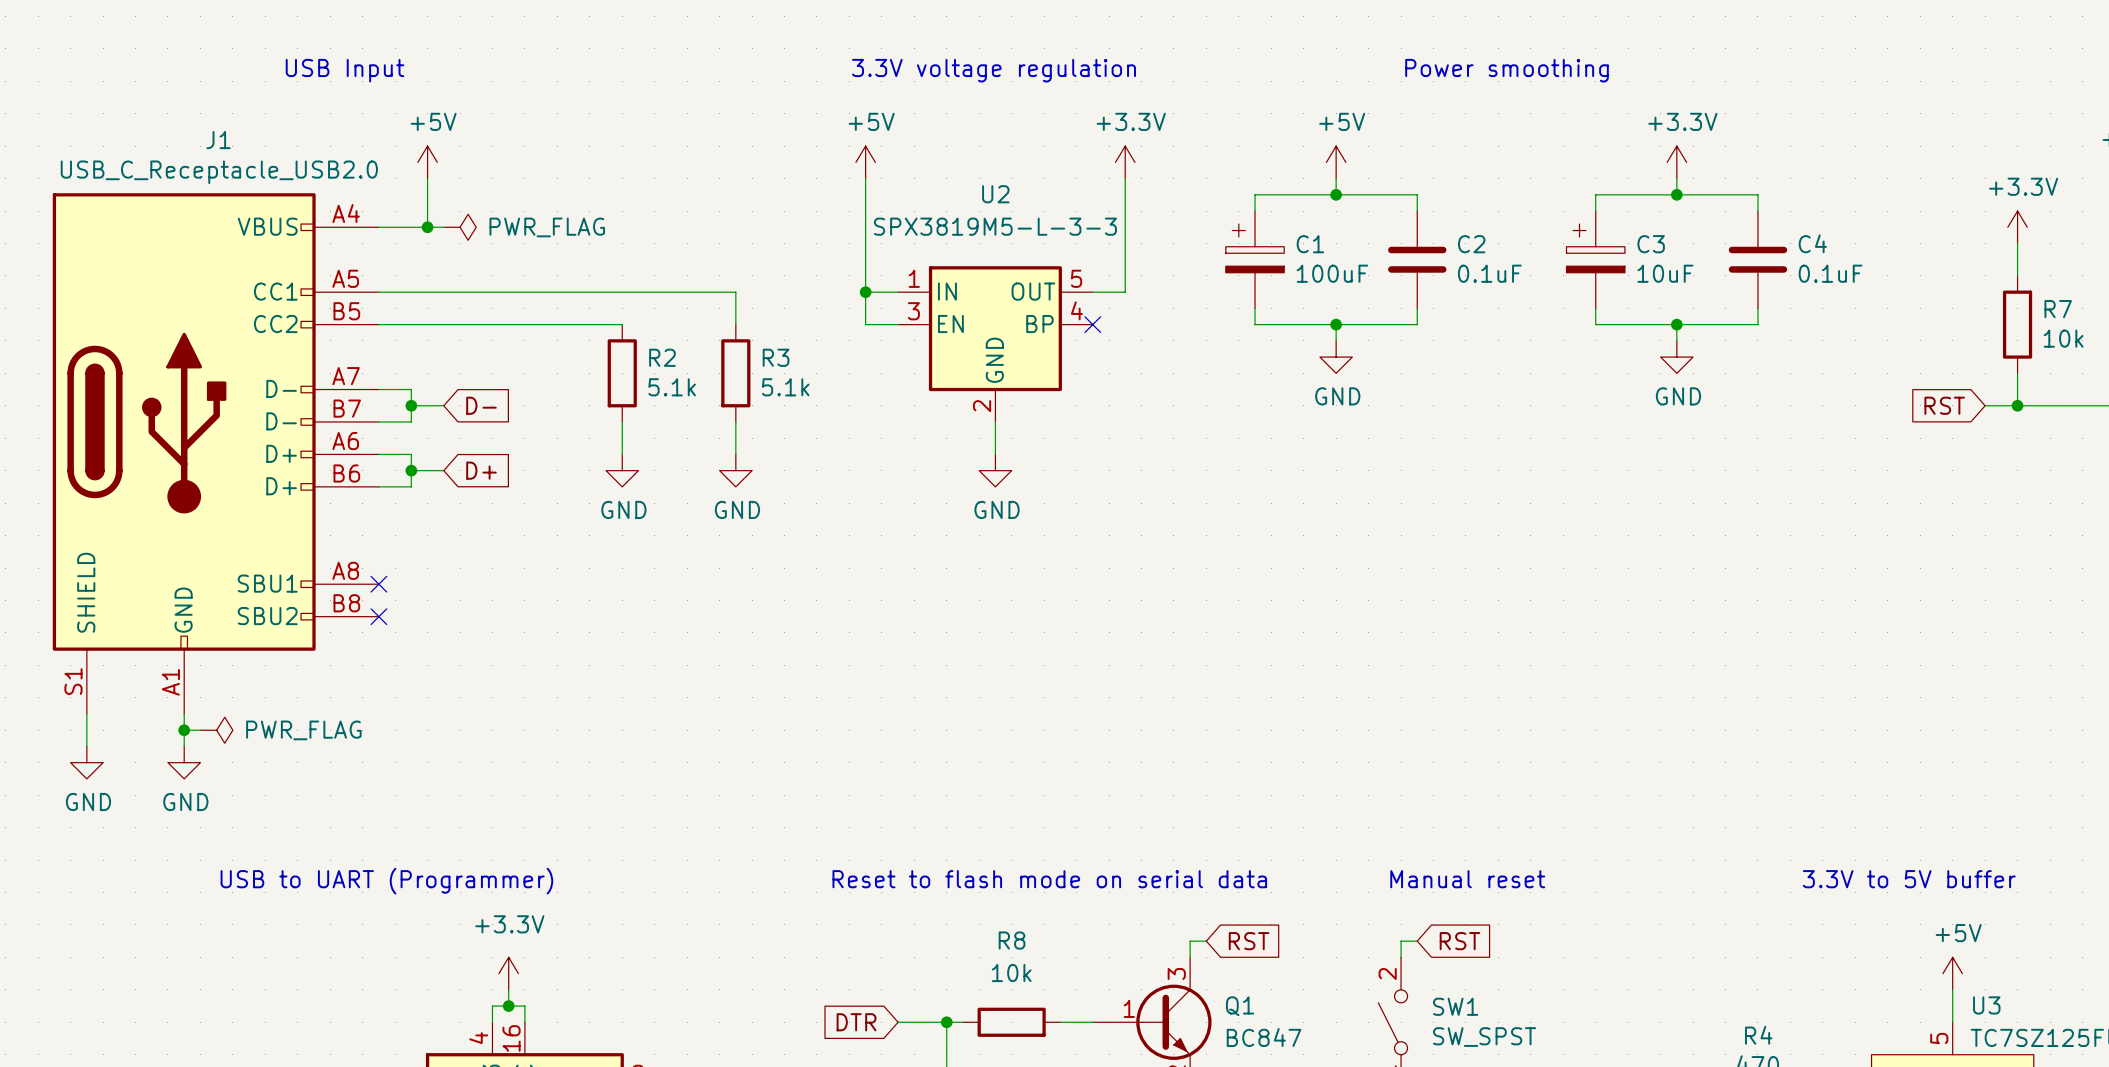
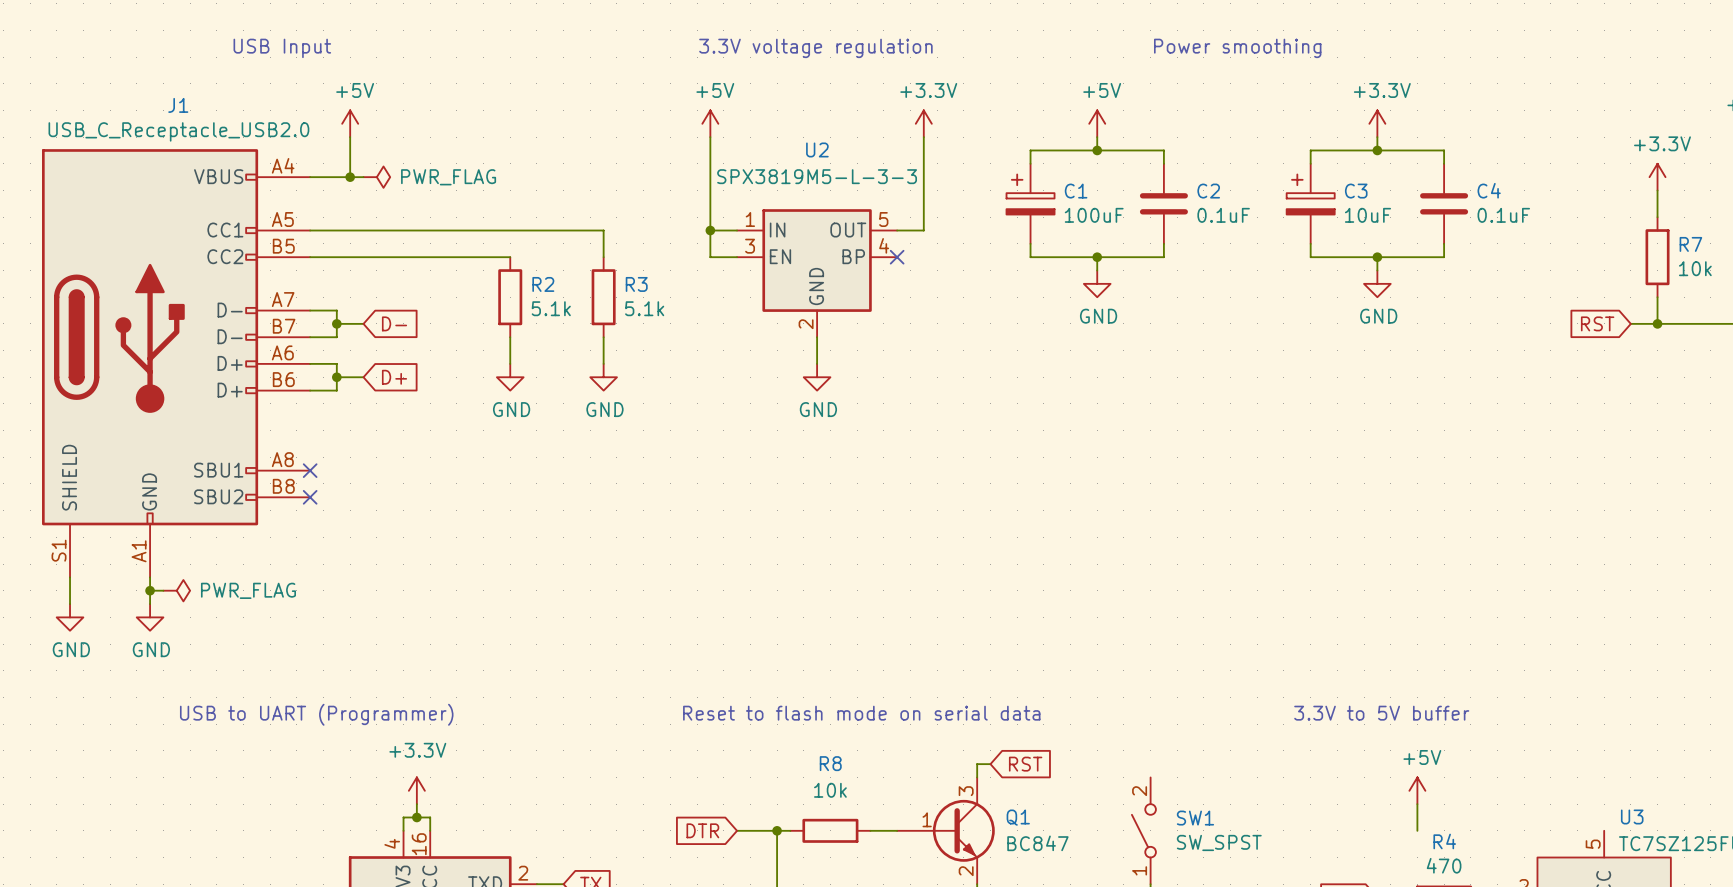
text: Manual reset (1467, 879) -> none
text position: 3.3V to 5V buffer (1909, 879) -> 3.3V to 5V buffer (1381, 713)
wire: (1417, 941) (1401, 941) (1401, 957) -> none
global label: RST (1459, 941) -> none
power symbol position: +5V (1952, 973) -> +5V (1417, 790)
wire: (1952, 989) (1952, 1022) -> (1417, 804) (1417, 830)

